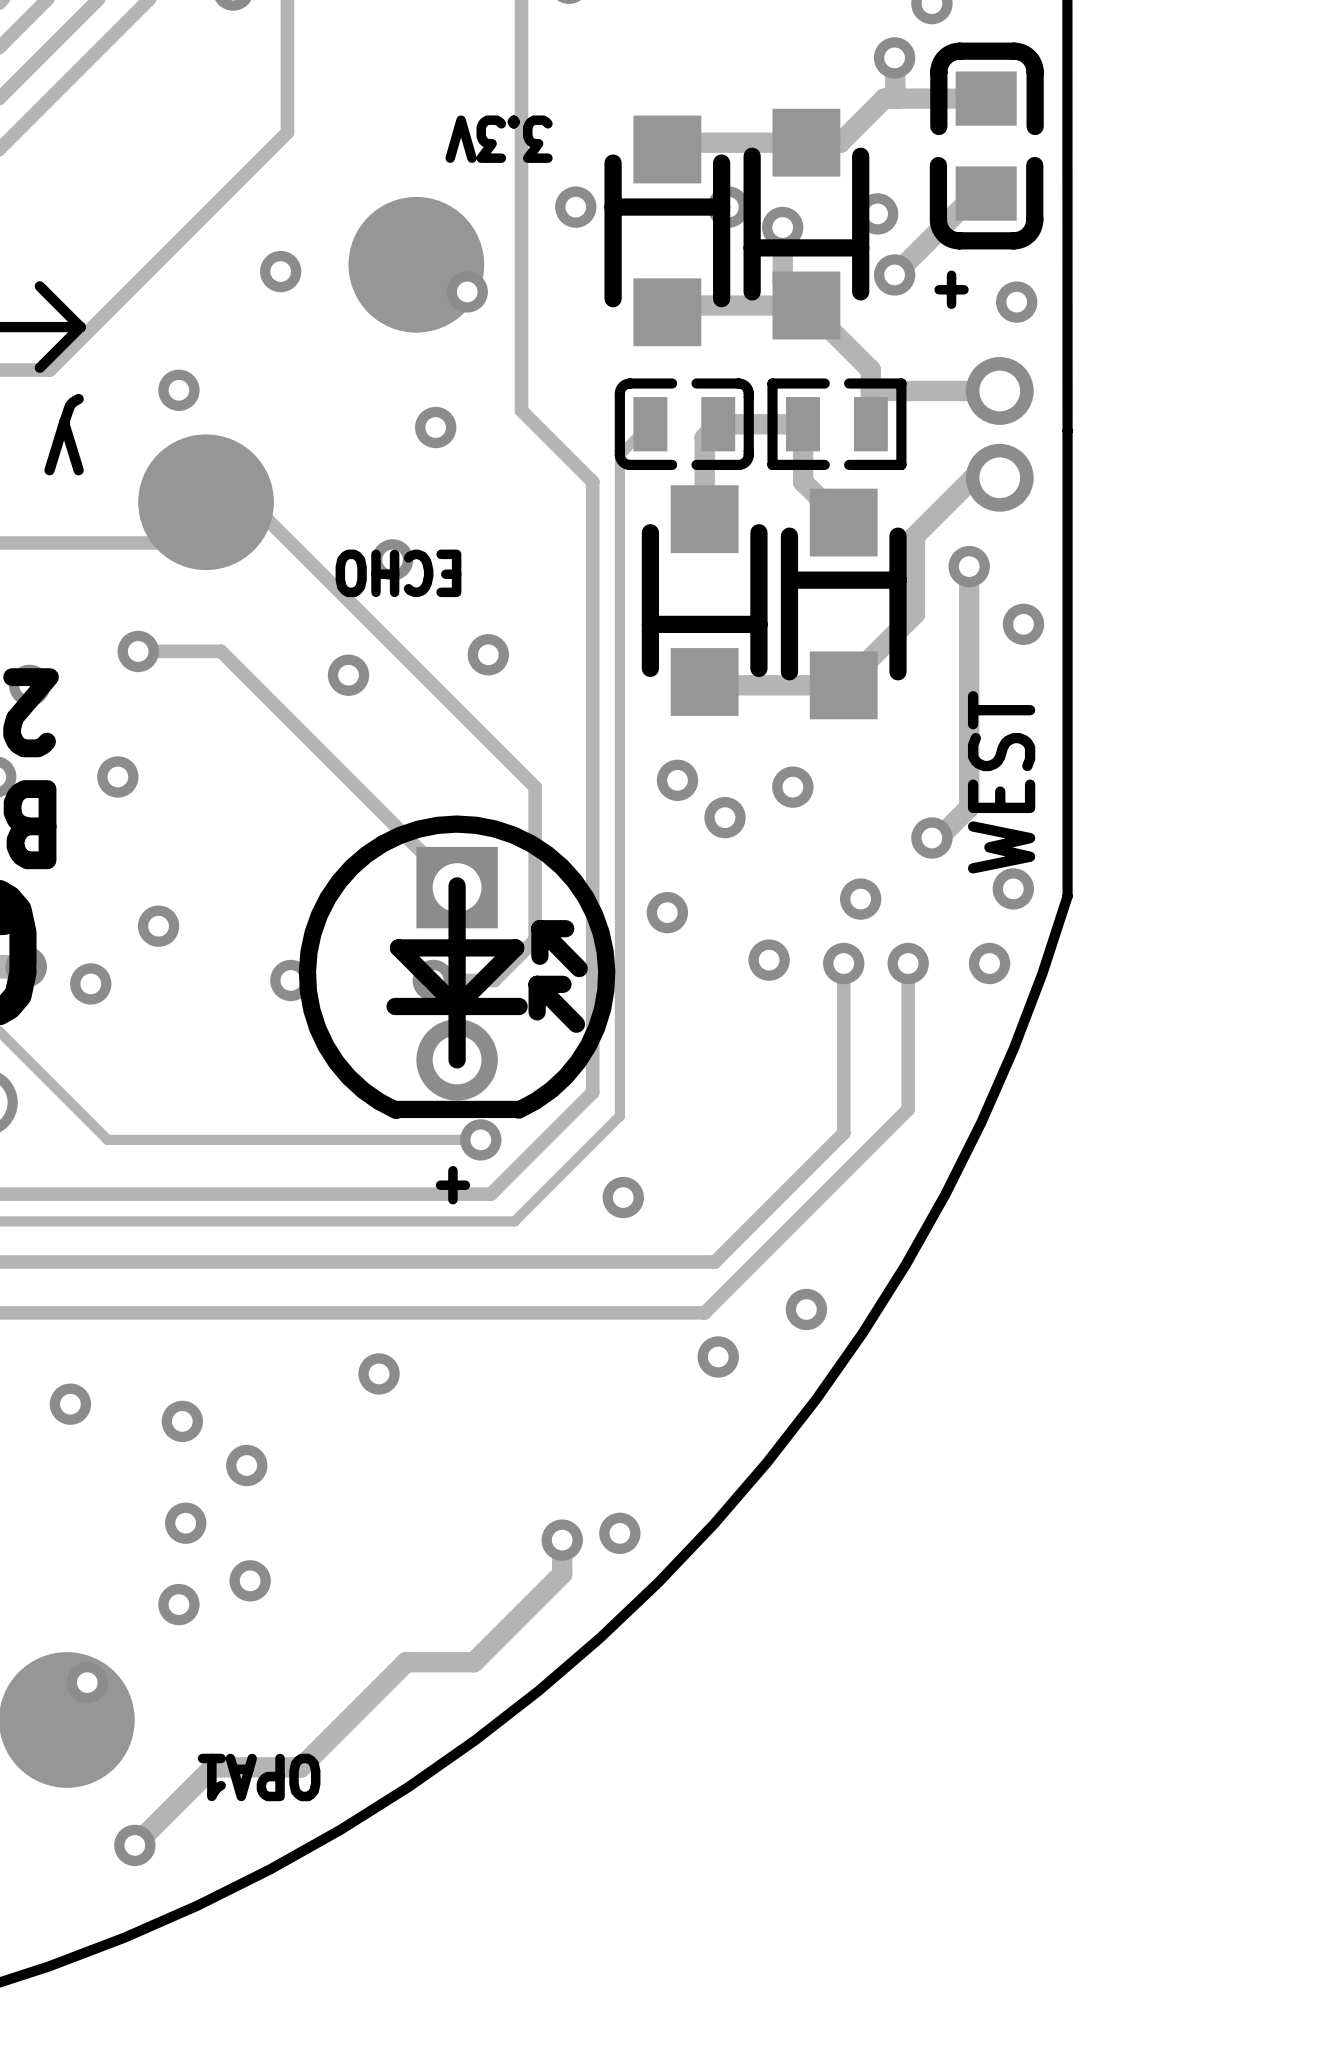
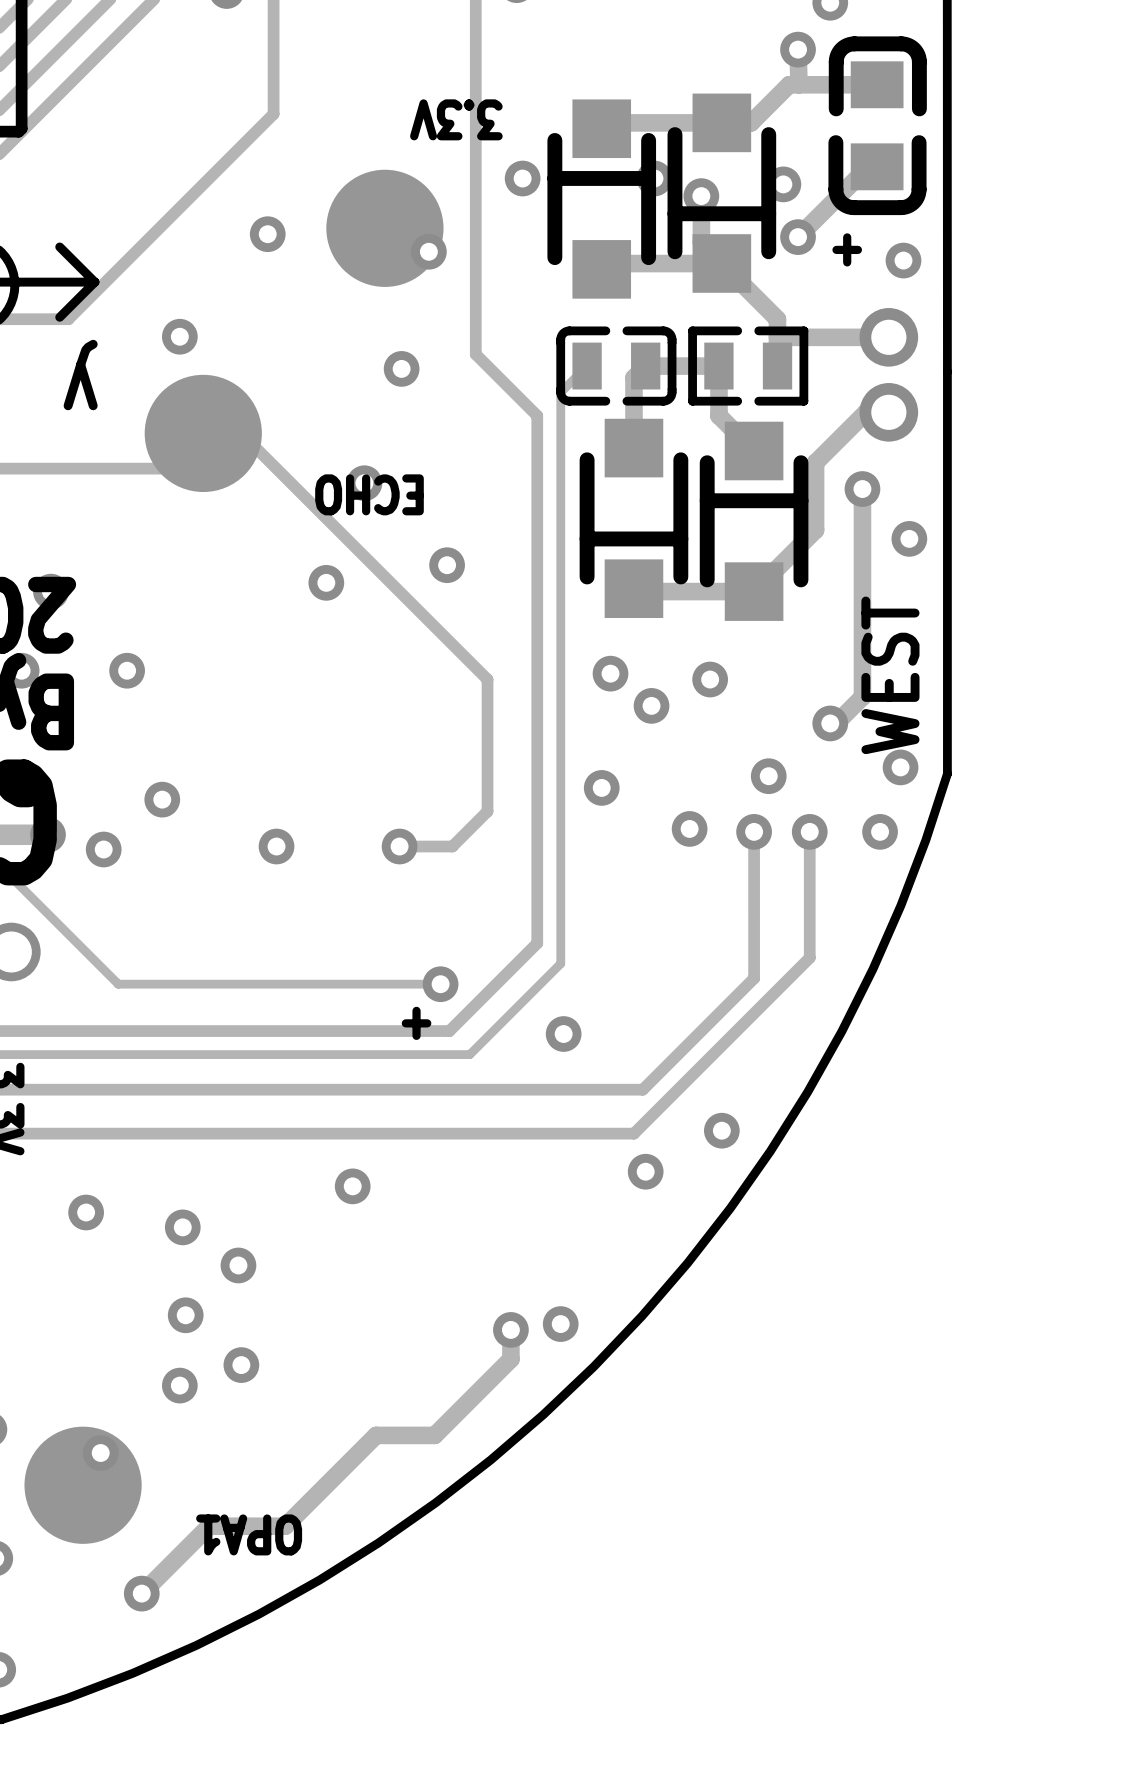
track: (138, 651) (221, 651) (457, 887) -> none
via: (138, 651) -> none
part: (457, 967) -> none

